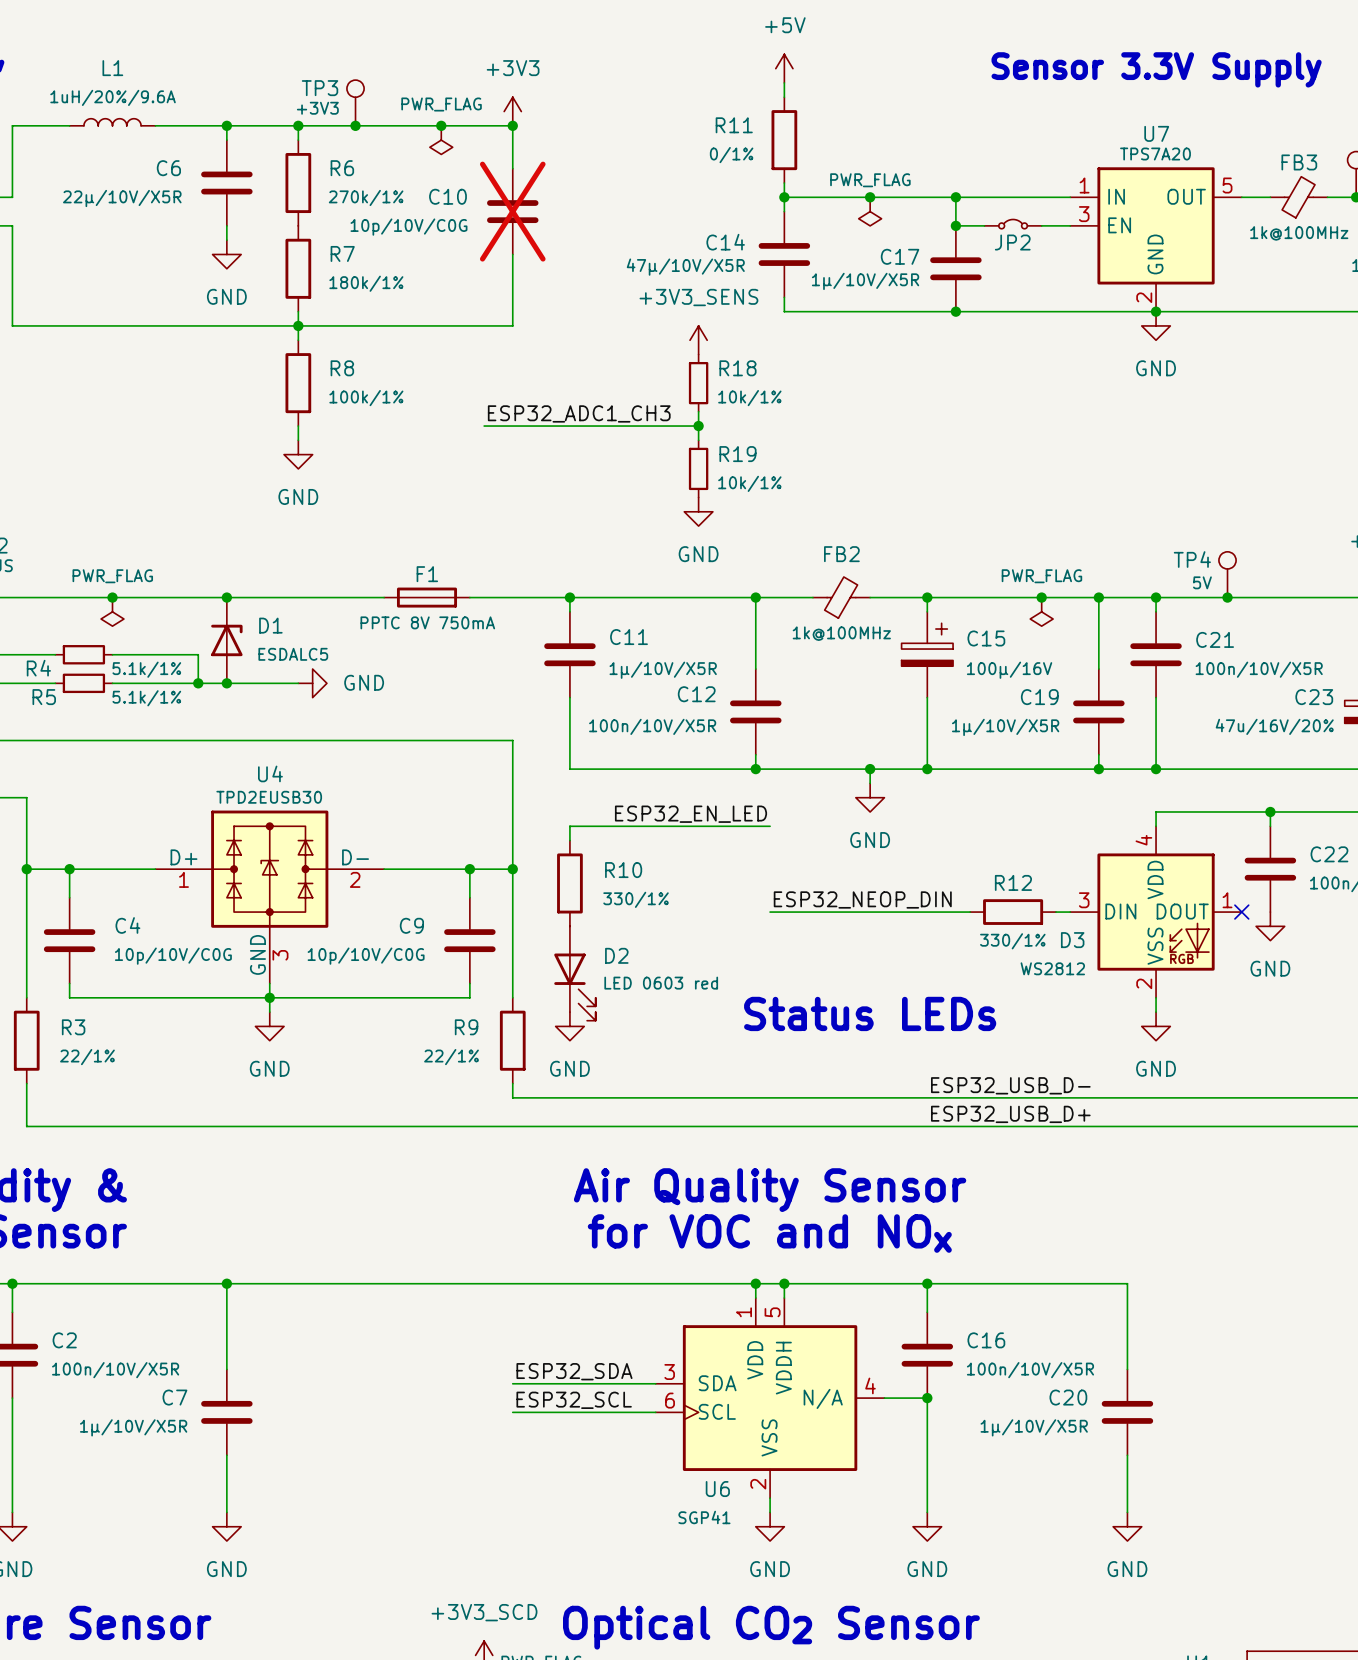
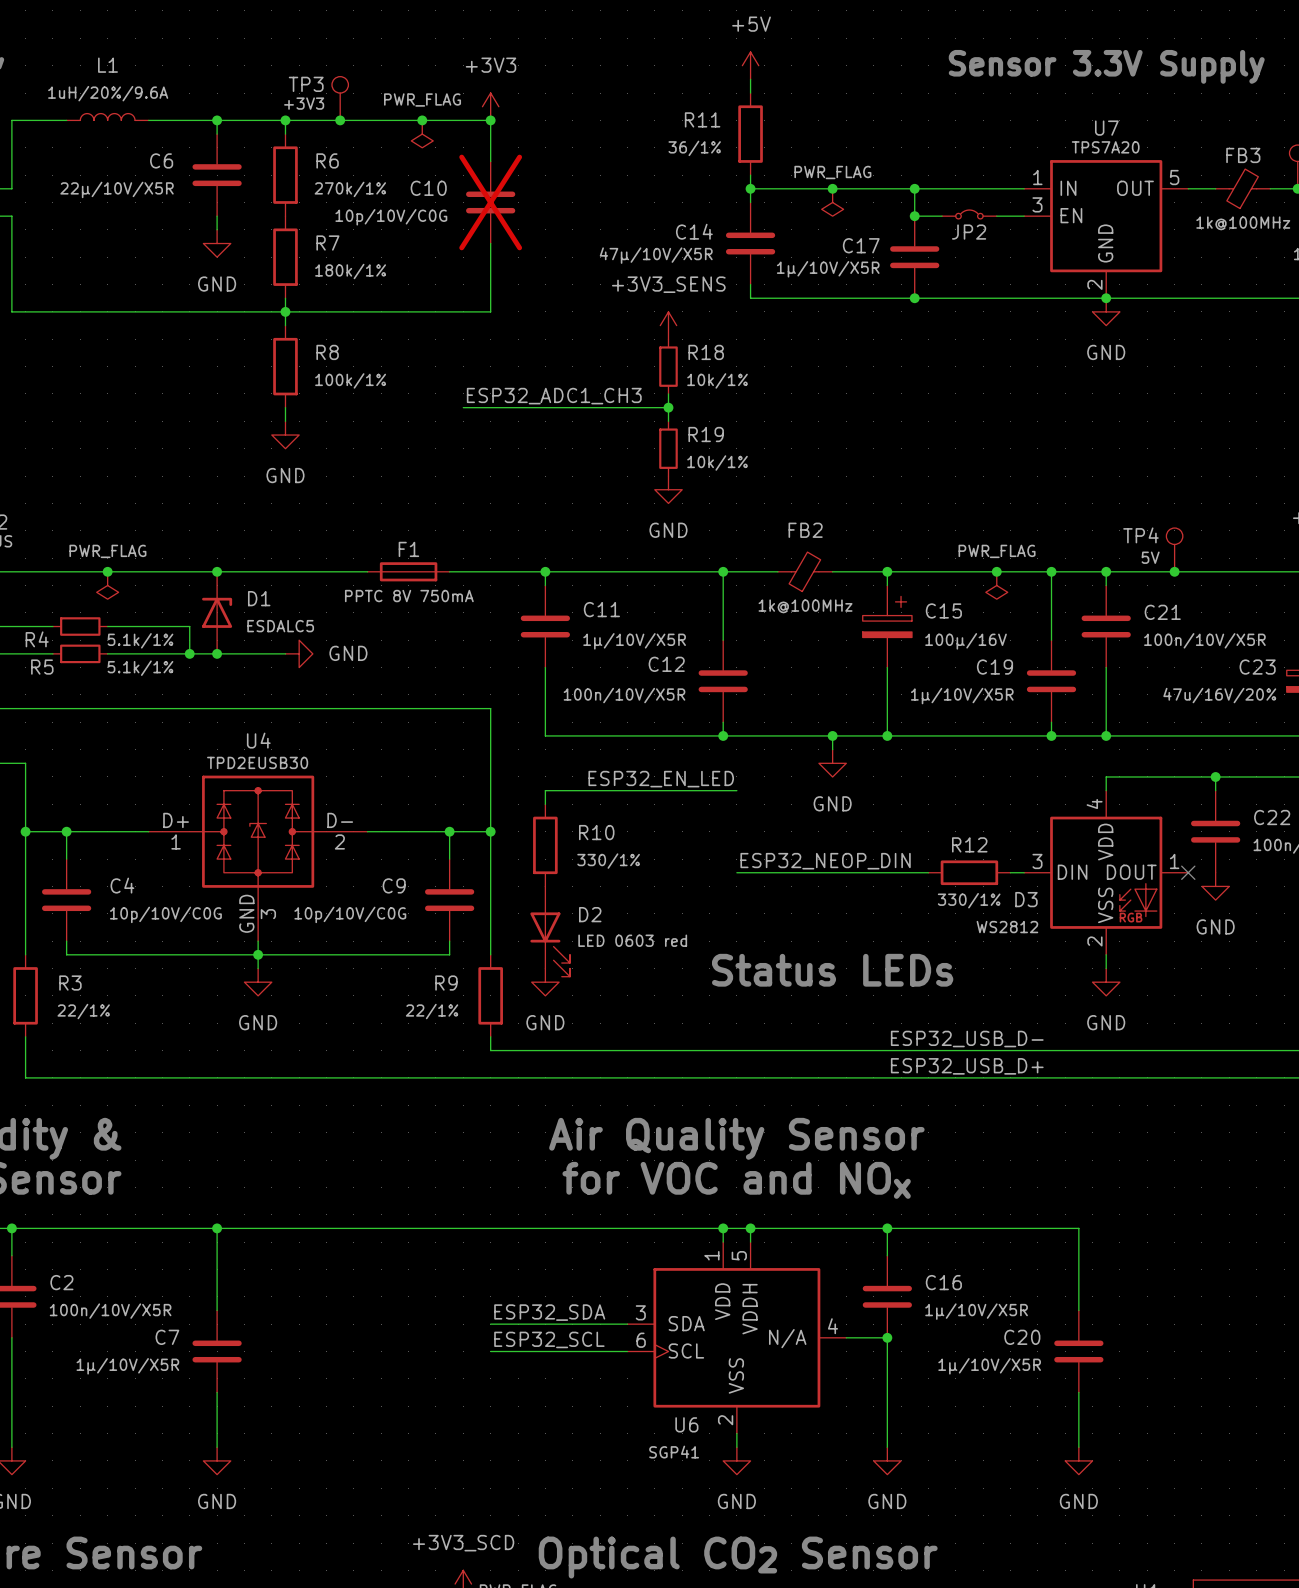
R11 value: 0/1% (731, 155) -> 36/1% (694, 148)
C16 value: 100n/10V/X5R (1030, 1370) -> 1µ/10V/X5R (976, 1311)

